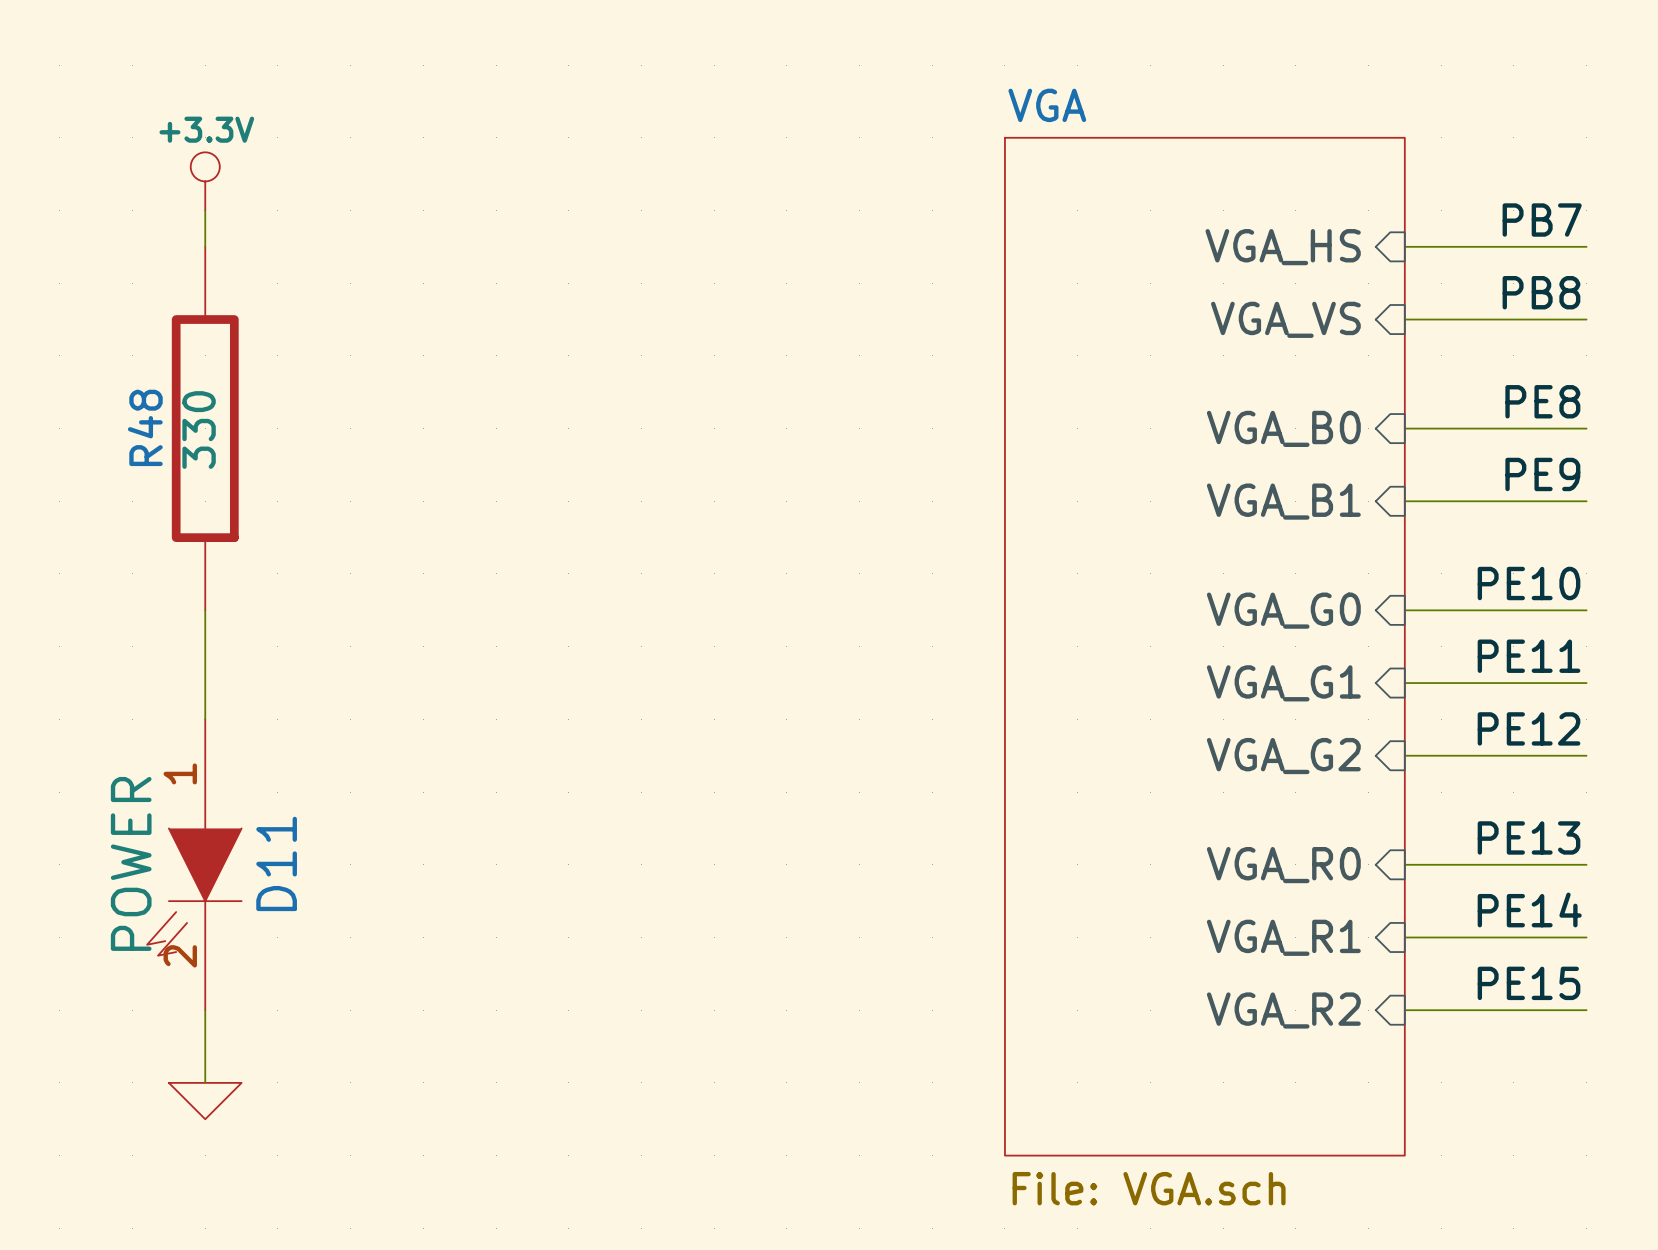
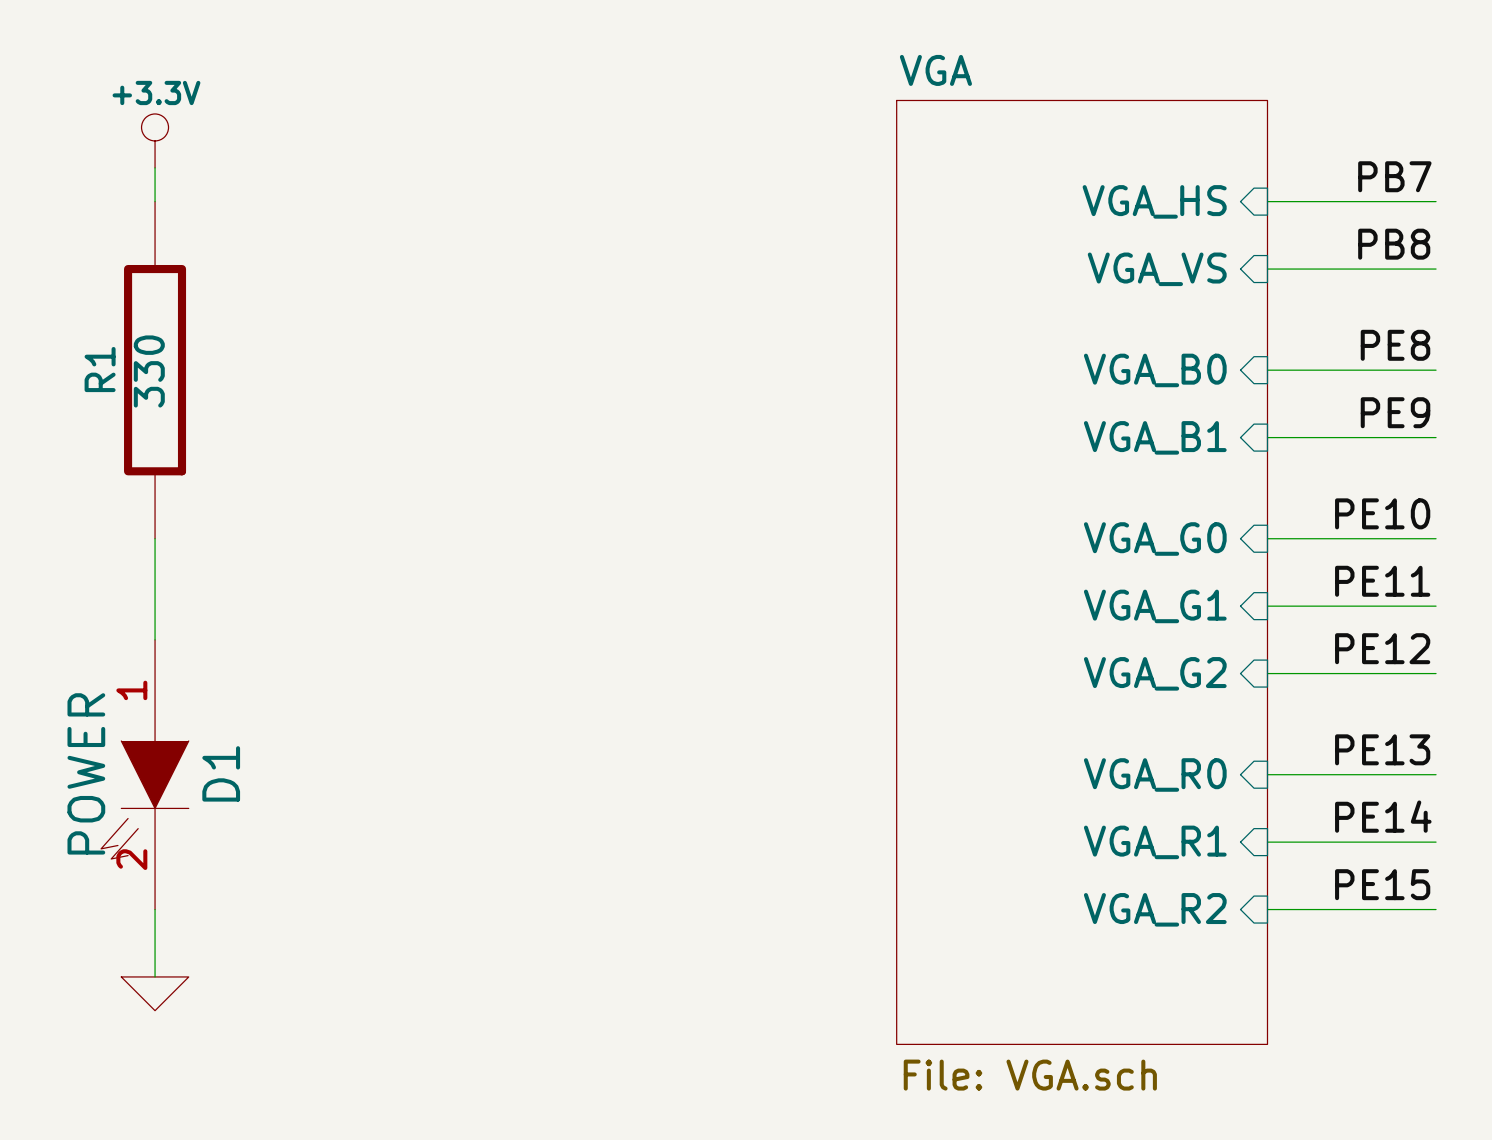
R48 name: R48 (145, 427) -> R1 (100, 369)
D11 name: D11 (276, 863) -> D1 (221, 773)

